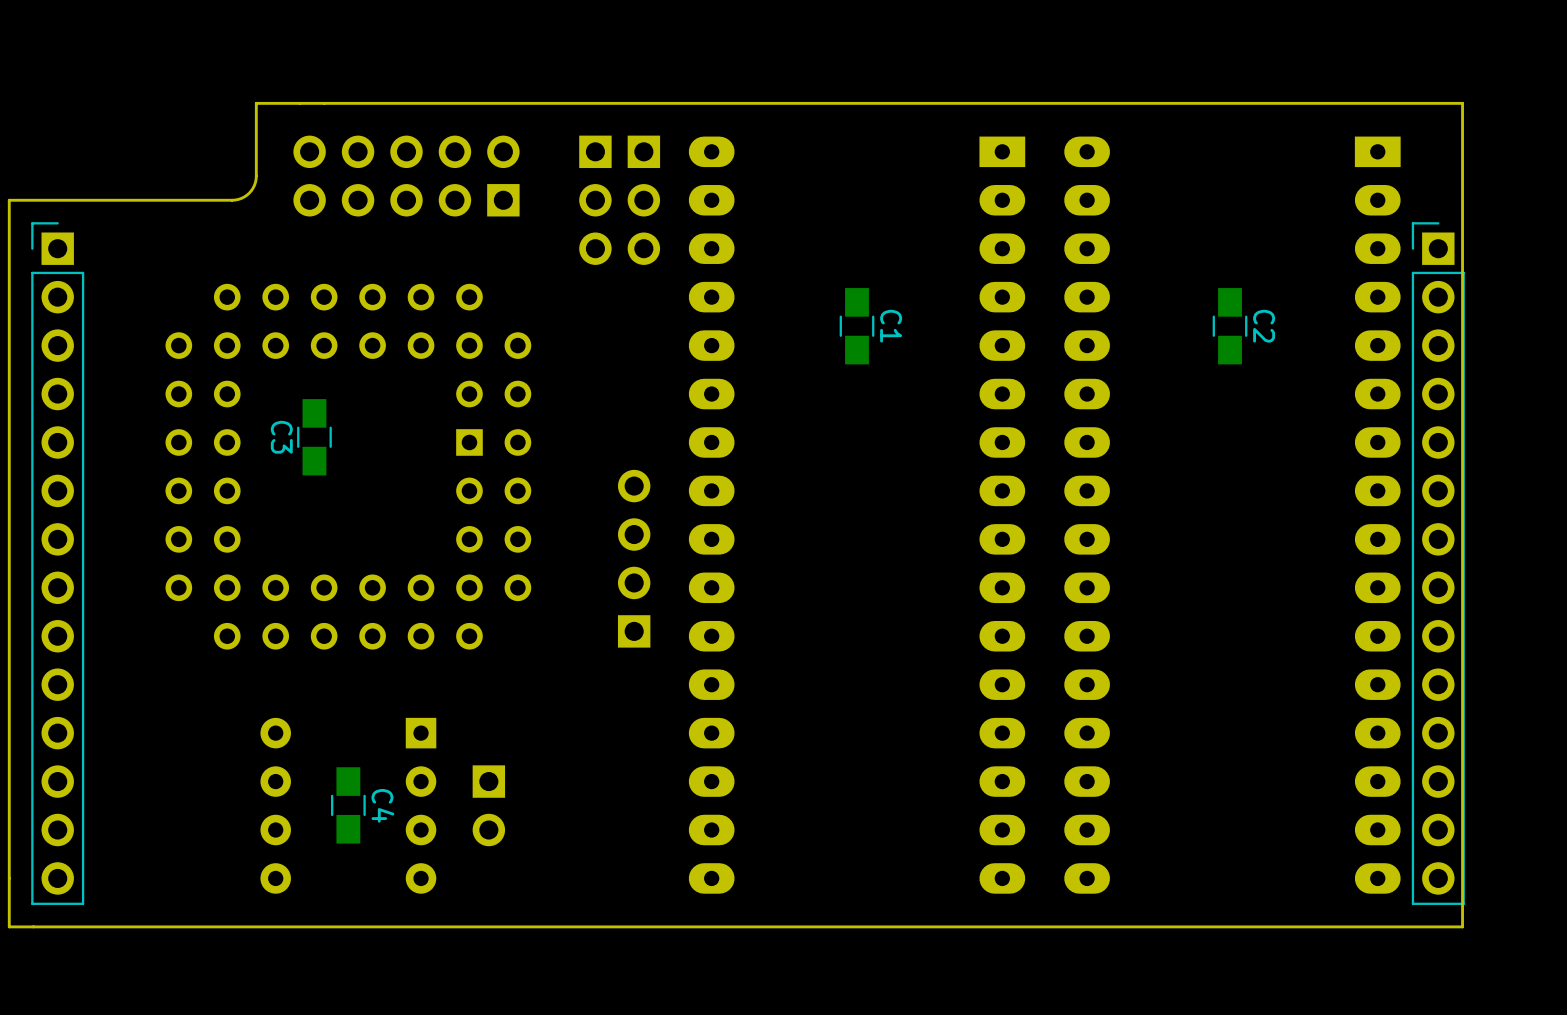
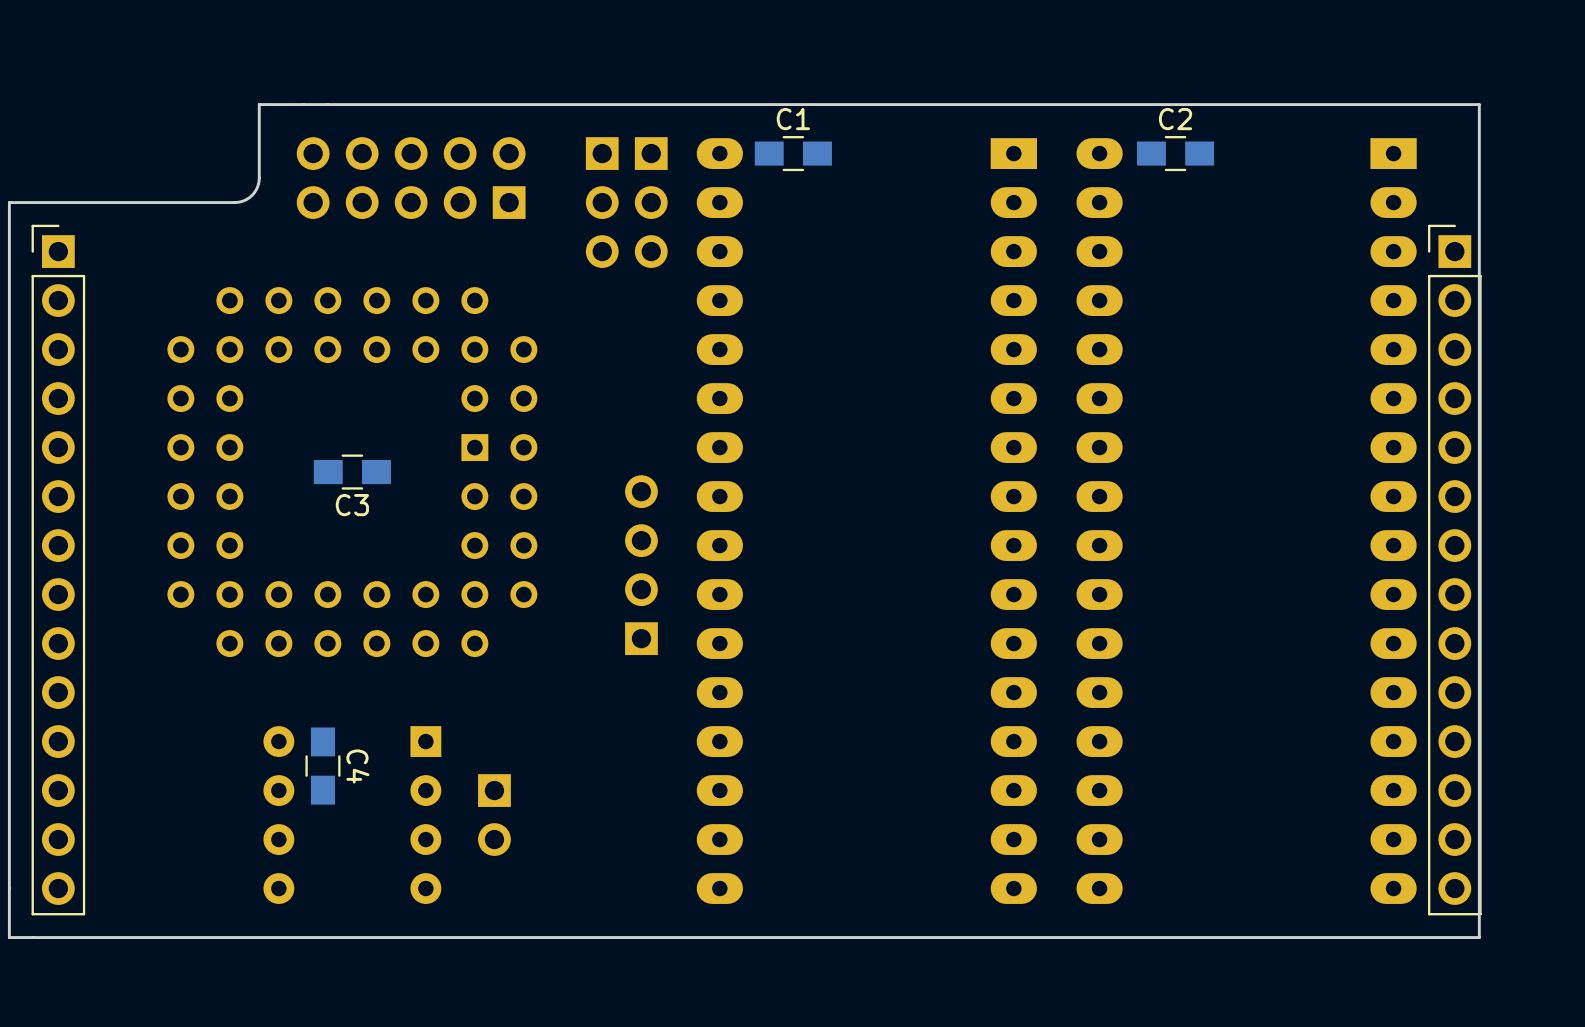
C1 rotation: 0° (857, 326) -> 90° clockwise (793, 153)
C1 position: (857, 326) -> (793, 153)
C1 name position: C1 (891, 326) -> C1 (793, 119)
C2 rotation: 0° (1230, 326) -> 90° clockwise (1175, 153)
C2 position: (1230, 326) -> (1175, 153)
C2 name position: C2 (1264, 326) -> C2 (1175, 119)
C3 name position: C3 (281, 437) -> C3 (352, 505)
C3 rotation: 0° (314, 437) -> 90° clockwise (352, 472)
C4 position: (348, 805) -> (322, 766)

